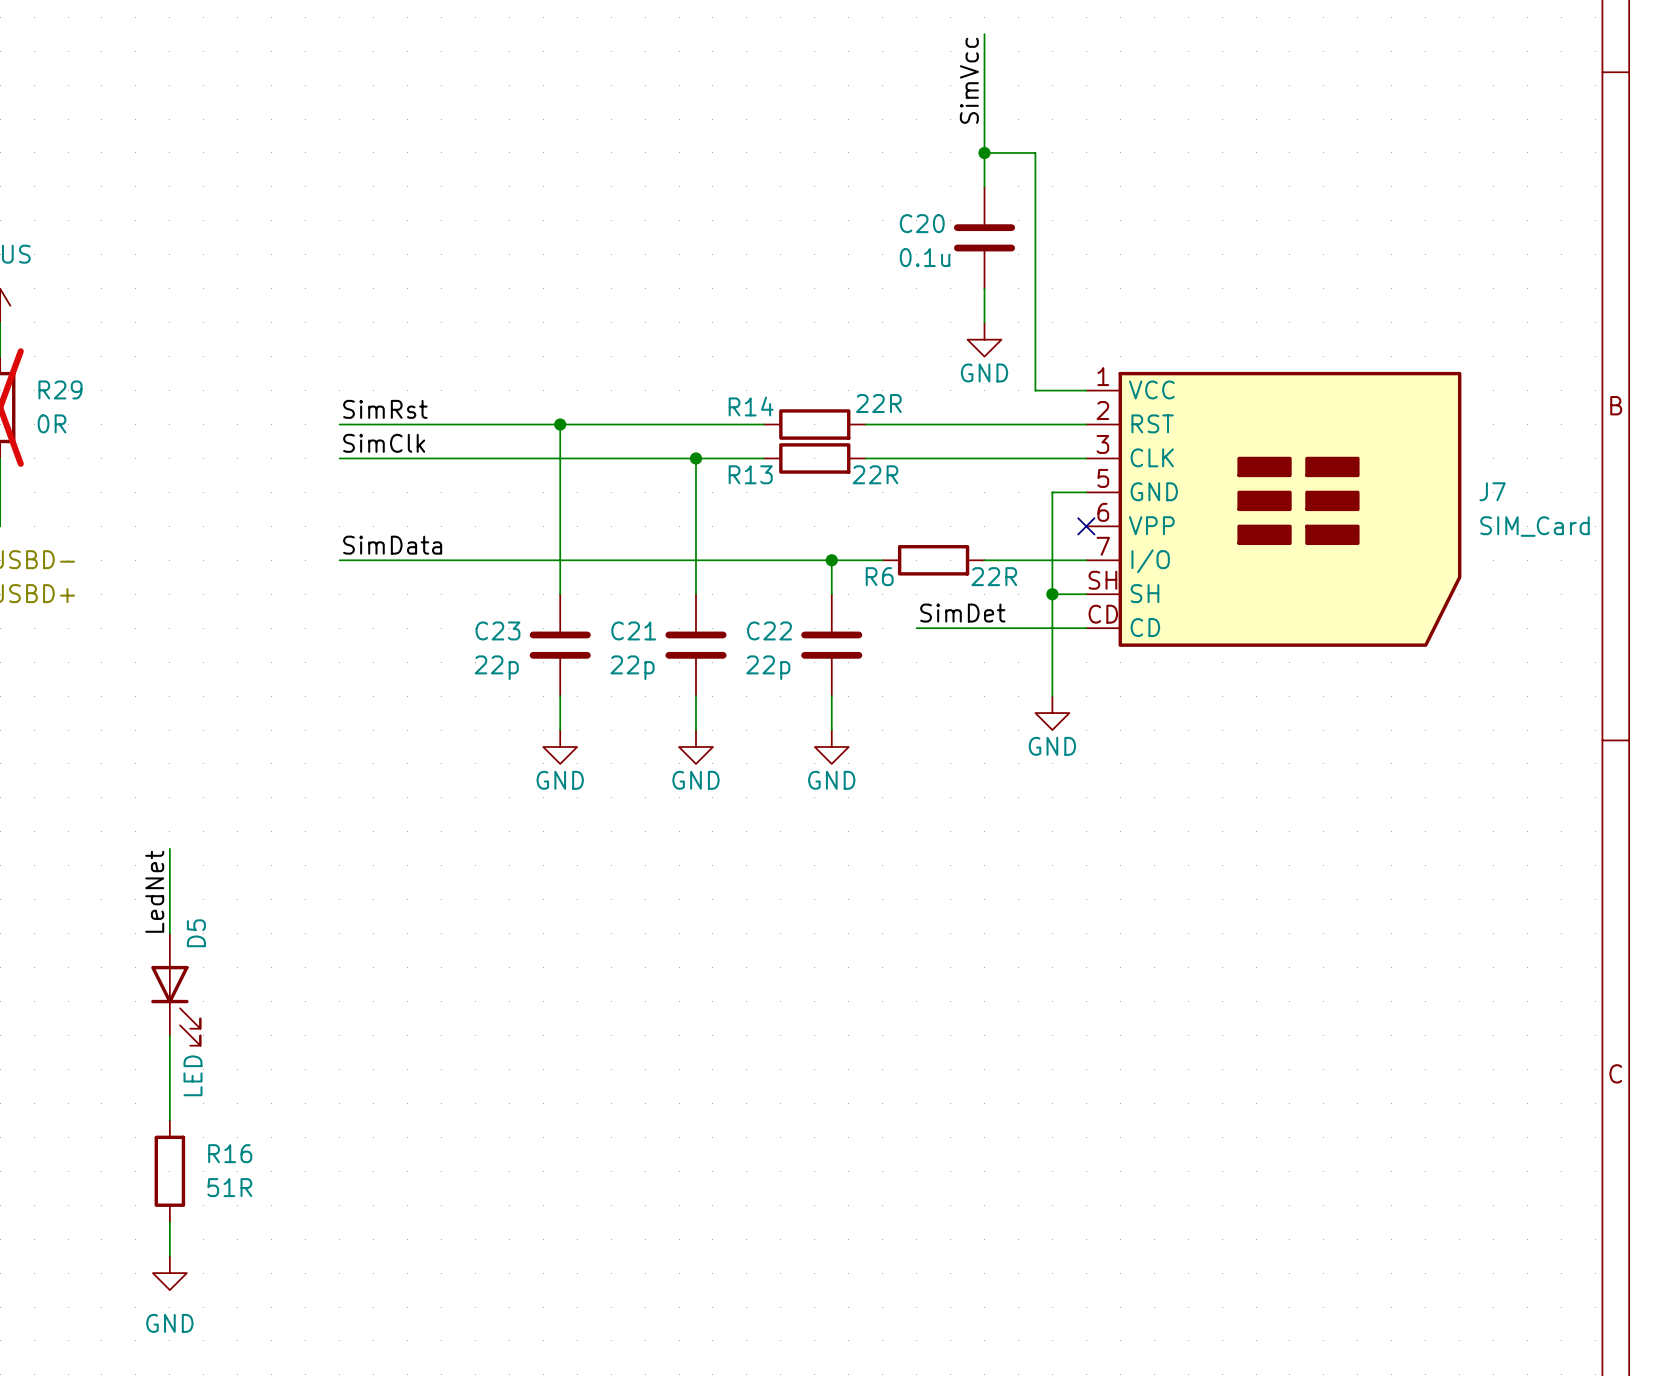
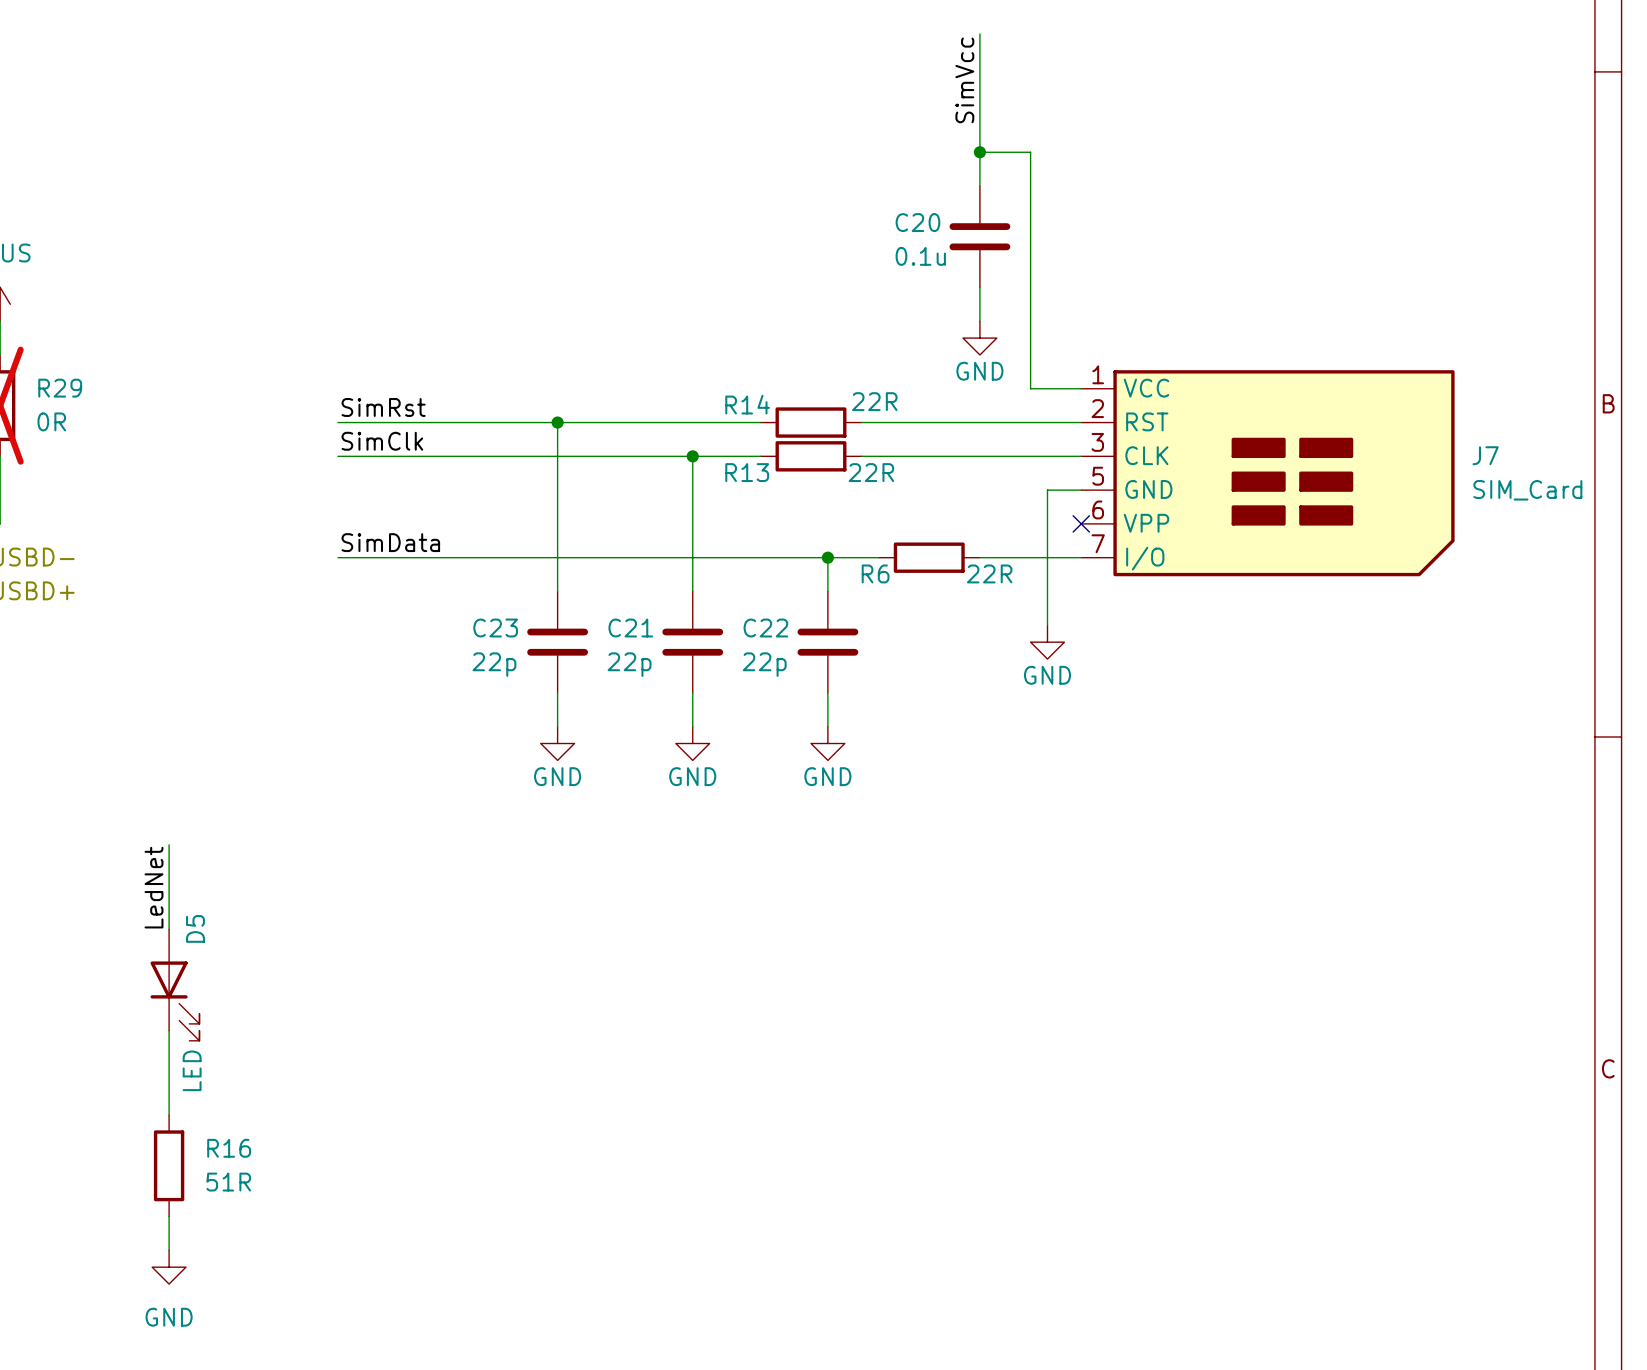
J7 symbol: [1086, 371, 1462, 647] -> [1081, 370, 1455, 577]
wire: (1052, 594) (1086, 594) -> none
junction: (1052, 594) -> none
label: SimDet (962, 613) -> none
wire: (916, 628) (1086, 628) -> none
wire: (1052, 628) (1052, 696) -> none
power symbol position: GND (1052, 713) -> GND (1047, 642)

